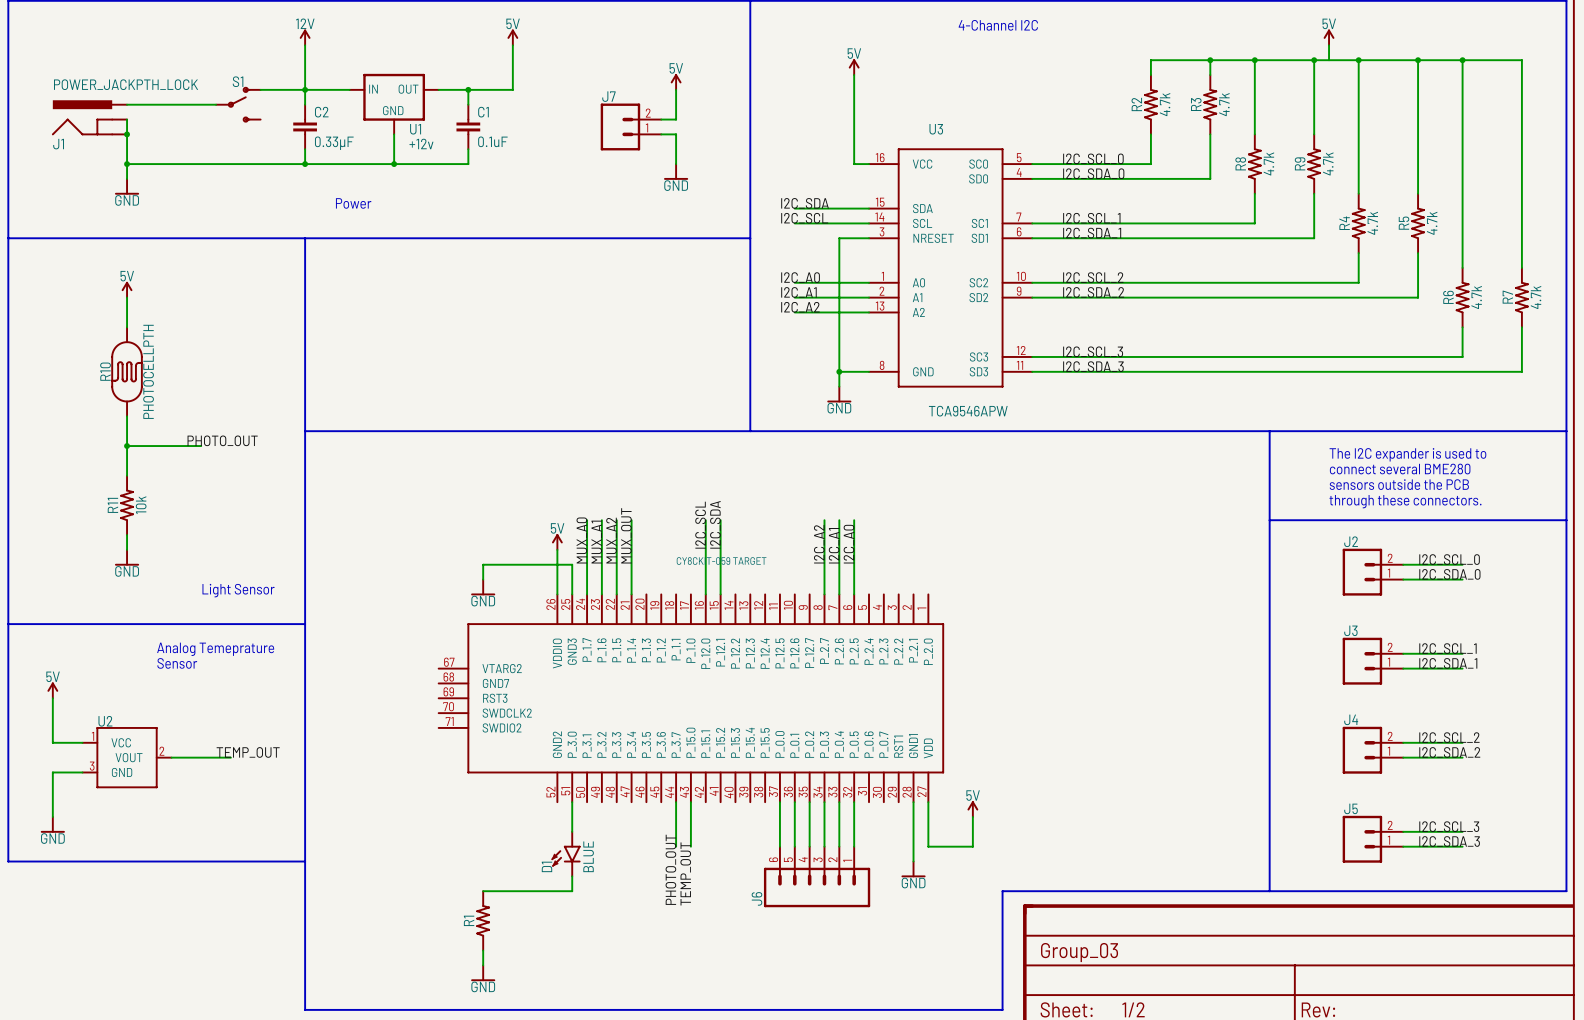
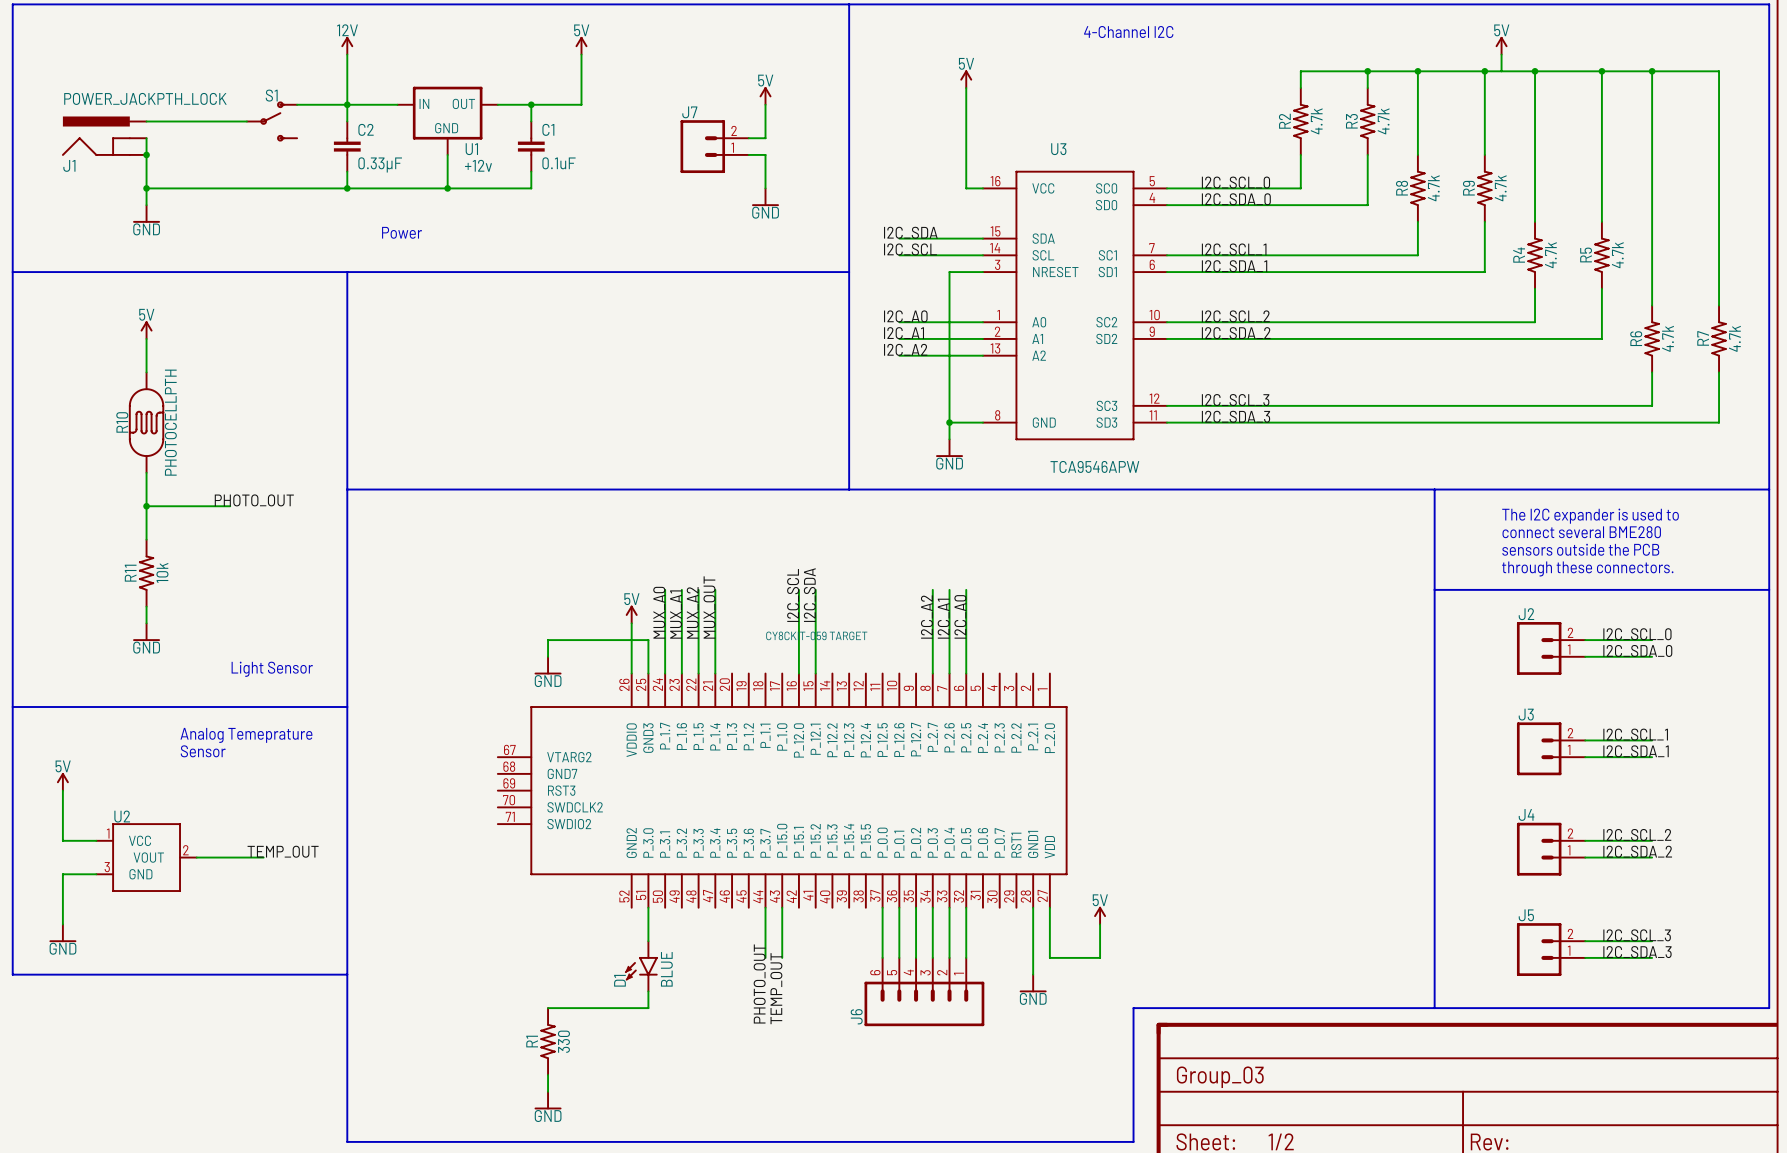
R1 value: none -> 330 (563, 1041)

